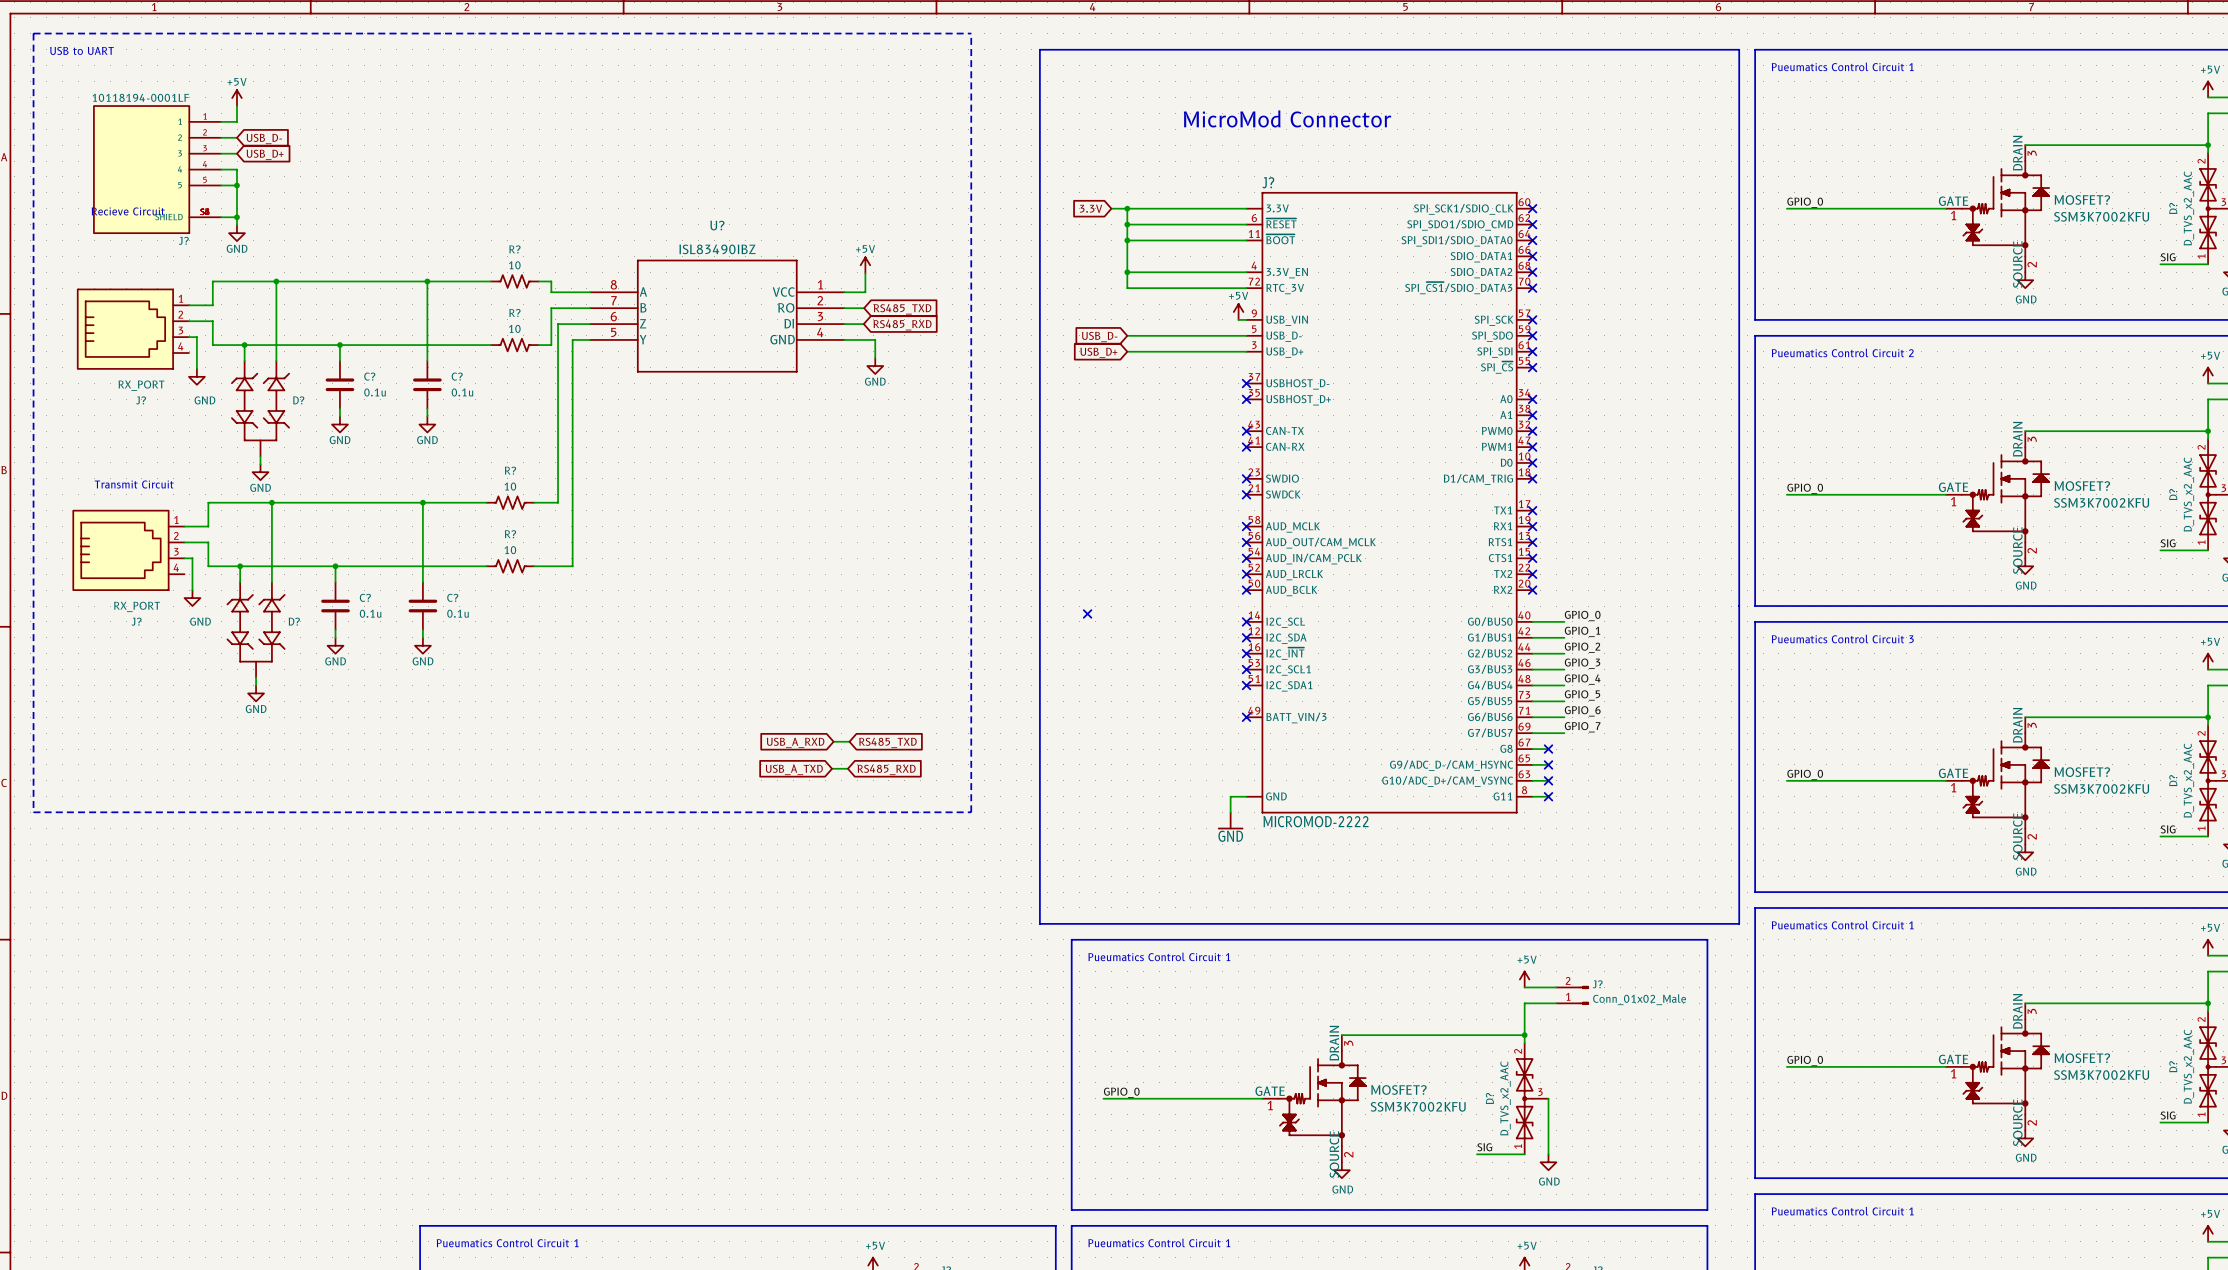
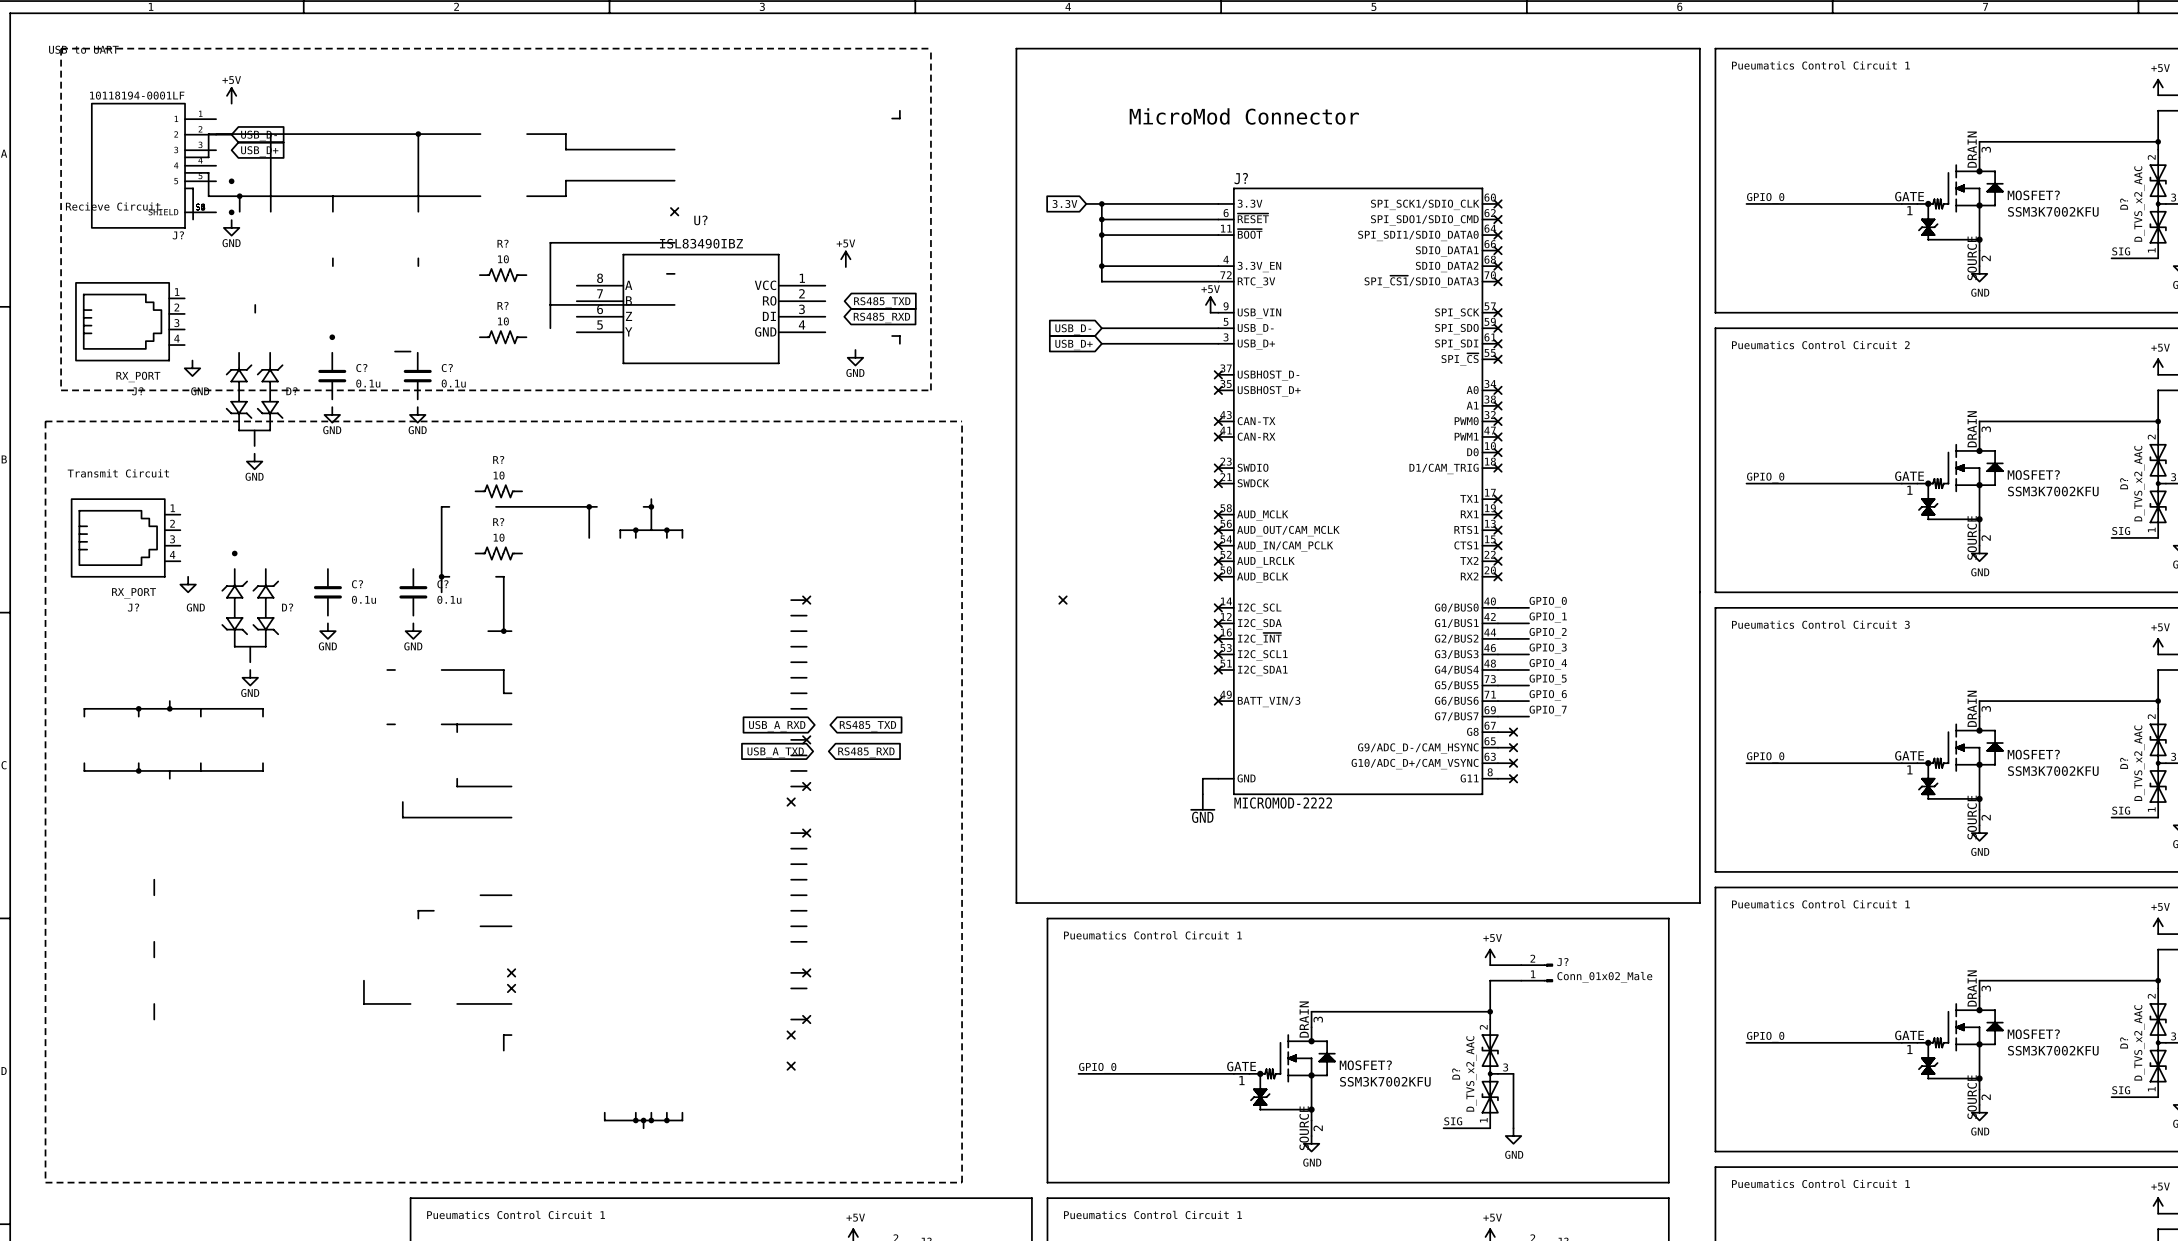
line: (33, 33) (33, 812) (971, 812) (971, 33) (33, 33) -> none
line: none -> (61, 48) (61, 390) (930, 390) (930, 48) (61, 48)
wire: (236, 106) (236, 121) (221, 121) -> none
wire: none -> (899, 110) (899, 118) (892, 118)
junction: none -> (418, 134)
wire: none -> (527, 134) (565, 134) (565, 149) (674, 149)
wire: (221, 153) (236, 153) -> none
wire: (221, 169) (236, 169) (236, 225) -> none
wire: none -> (674, 180) (565, 180) (565, 196) (527, 196)
wire: (221, 185) (236, 185) -> none
junction: none -> (239, 196)
no-connect mark: none -> (674, 211)
wire: (221, 217) (236, 217) -> none
wire: none -> (674, 242) (550, 242) (550, 328)
wire: (865, 273) (865, 292) (844, 292) -> none
wire: none -> (666, 273) (674, 273)
wire: (276, 281) (276, 360) -> (270, 134) (270, 211)
junction: (276, 281) -> none
wire: (427, 281) (427, 360) -> (418, 134) (418, 211)
junction: (427, 281) -> none
wire: (490, 281) (212, 281) (212, 305) (188, 305) -> (480, 134) (208, 134) (208, 157) (185, 157)
wire: (538, 281) (551, 281) (551, 292) (590, 292) -> none
wire: (590, 308) (551, 308) (551, 345) (538, 345) -> none
wire: (844, 308) (864, 308) -> none
wire: none -> (550, 304) (674, 304)
wire: (188, 321) (212, 321) (212, 345) (490, 345) -> (185, 172) (208, 172) (208, 196) (480, 196)
wire: (590, 324) (558, 324) (558, 502) (534, 502) -> none
wire: (844, 324) (863, 324) -> none
wire: (188, 337) (196, 337) (196, 368) -> (185, 188) (193, 188) (193, 219)
wire: (590, 339) (572, 339) (572, 566) (534, 566) -> none
wire: (844, 339) (875, 339) (875, 358) -> none
wire: none -> (892, 336) (899, 336) (899, 343)
wire: (244, 345) (244, 360) -> (239, 196) (239, 211)
junction: (244, 345) -> none
wire: (339, 345) (339, 360) -> (332, 196) (332, 211)
wire: none -> (395, 351) (410, 351)
wire: (339, 408) (339, 416) -> (332, 258) (332, 266)
wire: (427, 408) (427, 416) -> (418, 258) (418, 266)
line: none -> (45, 421) (45, 1182) (962, 1182) (962, 421) (45, 421)
wire: (260, 456) (260, 464) -> (255, 304) (255, 312)
wire: (271, 502) (271, 582) -> none
junction: (271, 502) -> none
wire: (422, 502) (422, 582) -> none
junction: (422, 502) -> none
wire: (486, 502) (208, 502) (208, 526) (184, 526) -> none
wire: none -> (651, 499) (651, 530)
wire: none -> (449, 506) (441, 506) (441, 592)
wire: none -> (496, 506) (596, 506)
wire: none -> (589, 506) (589, 537)
junction: none -> (589, 506)
wire: none -> (643, 506) (651, 506)
junction: none -> (651, 506)
wire: (184, 542) (208, 542) (208, 566) (486, 566) -> none
wire: none -> (635, 530) (635, 537)
junction: none -> (635, 530)
wire: none -> (666, 530) (666, 537)
junction: none -> (666, 530)
wire: none -> (620, 537) (620, 530) (682, 530) (682, 537)
wire: (184, 558) (192, 558) (192, 590) -> none
wire: (240, 566) (240, 582) -> none
wire: (335, 566) (335, 582) -> none
junction: (335, 566) -> none
wire: none -> (441, 576) (449, 576)
junction: none -> (441, 576)
wire: none -> (496, 576) (503, 576) (503, 631)
wire: none -> (791, 600) (806, 600)
no-connect mark: none -> (806, 600)
wire: (335, 629) (335, 637) -> none
wire: (422, 629) (422, 637) -> (457, 724) (457, 732)
wire: none -> (791, 615) (806, 615)
wire: none -> (488, 631) (511, 631)
junction: none -> (503, 631)
wire: none -> (791, 631) (806, 631)
wire: none -> (791, 646) (806, 646)
wire: (256, 677) (256, 685) -> (200, 708) (200, 716)
wire: none -> (791, 662) (806, 662)
wire: none -> (387, 669) (395, 669)
wire: none -> (441, 669) (503, 669) (503, 693) (511, 693)
wire: none -> (791, 677) (806, 677)
wire: none -> (791, 693) (806, 693)
wire: none -> (169, 701) (169, 708)
wire: none -> (138, 708) (138, 716)
junction: none -> (138, 708)
junction: none -> (169, 708)
wire: none -> (791, 708) (806, 708)
wire: none -> (84, 716) (84, 708) (263, 708) (263, 716)
wire: none -> (387, 724) (395, 724)
wire: none -> (441, 724) (511, 724)
wire: (833, 741) (849, 741) -> (791, 739) (806, 739)
no-connect mark: none -> (806, 739)
wire: (832, 768) (847, 768) -> (791, 755) (806, 755)
wire: none -> (84, 763) (84, 770) (263, 770) (263, 763)
wire: none -> (138, 763) (138, 770)
wire: none -> (200, 763) (200, 770)
junction: none -> (138, 770)
wire: none -> (169, 770) (169, 778)
wire: none -> (791, 770) (806, 770)
wire: none -> (457, 778) (457, 786) (511, 786)
wire: none -> (791, 786) (806, 786)
no-connect mark: none -> (806, 786)
wire: none -> (402, 802) (402, 817) (511, 817)
no-connect mark: none -> (791, 802)
wire: none -> (791, 833) (806, 833)
no-connect mark: none -> (806, 833)
wire: none -> (791, 848) (806, 848)
wire: none -> (791, 864) (806, 864)
wire: none -> (154, 879) (154, 895)
wire: none -> (791, 879) (806, 879)
wire: none -> (480, 895) (511, 895)
wire: none -> (791, 895) (806, 895)
wire: none -> (433, 910) (418, 910) (418, 918)
wire: none -> (791, 910) (806, 910)
wire: none -> (480, 926) (511, 926)
wire: none -> (791, 926) (806, 926)
wire: none -> (154, 941) (154, 957)
wire: none -> (791, 941) (806, 941)
no-connect mark: none -> (511, 972)
wire: none -> (791, 972) (806, 972)
no-connect mark: none -> (806, 972)
wire: none -> (363, 980) (363, 1003) (410, 1003)
no-connect mark: none -> (511, 988)
wire: none -> (791, 988) (806, 988)
wire: none -> (154, 1003) (154, 1019)
wire: none -> (457, 1003) (511, 1003)
wire: none -> (791, 1019) (806, 1019)
no-connect mark: none -> (806, 1019)
wire: none -> (511, 1035) (503, 1035) (503, 1050)
no-connect mark: none -> (791, 1035)
no-connect mark: none -> (791, 1066)
wire: none -> (604, 1112) (604, 1120) (682, 1120) (682, 1112)
wire: none -> (635, 1112) (635, 1120)
wire: none -> (651, 1112) (651, 1120)
wire: none -> (666, 1112) (666, 1120)
junction: none -> (635, 1120)
wire: none -> (643, 1120) (643, 1128)
junction: none -> (643, 1120)
junction: none -> (651, 1120)
junction: none -> (666, 1120)

